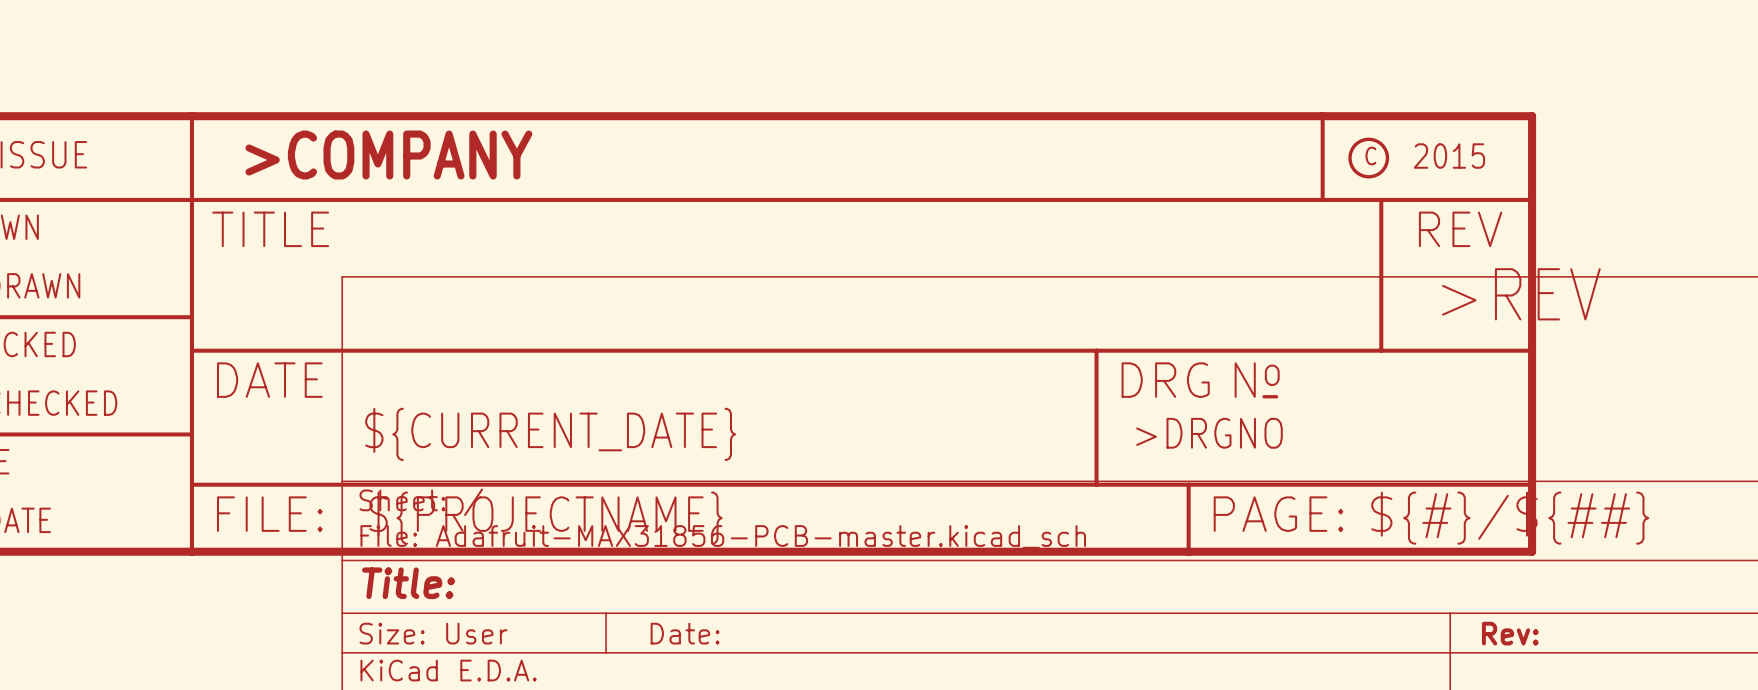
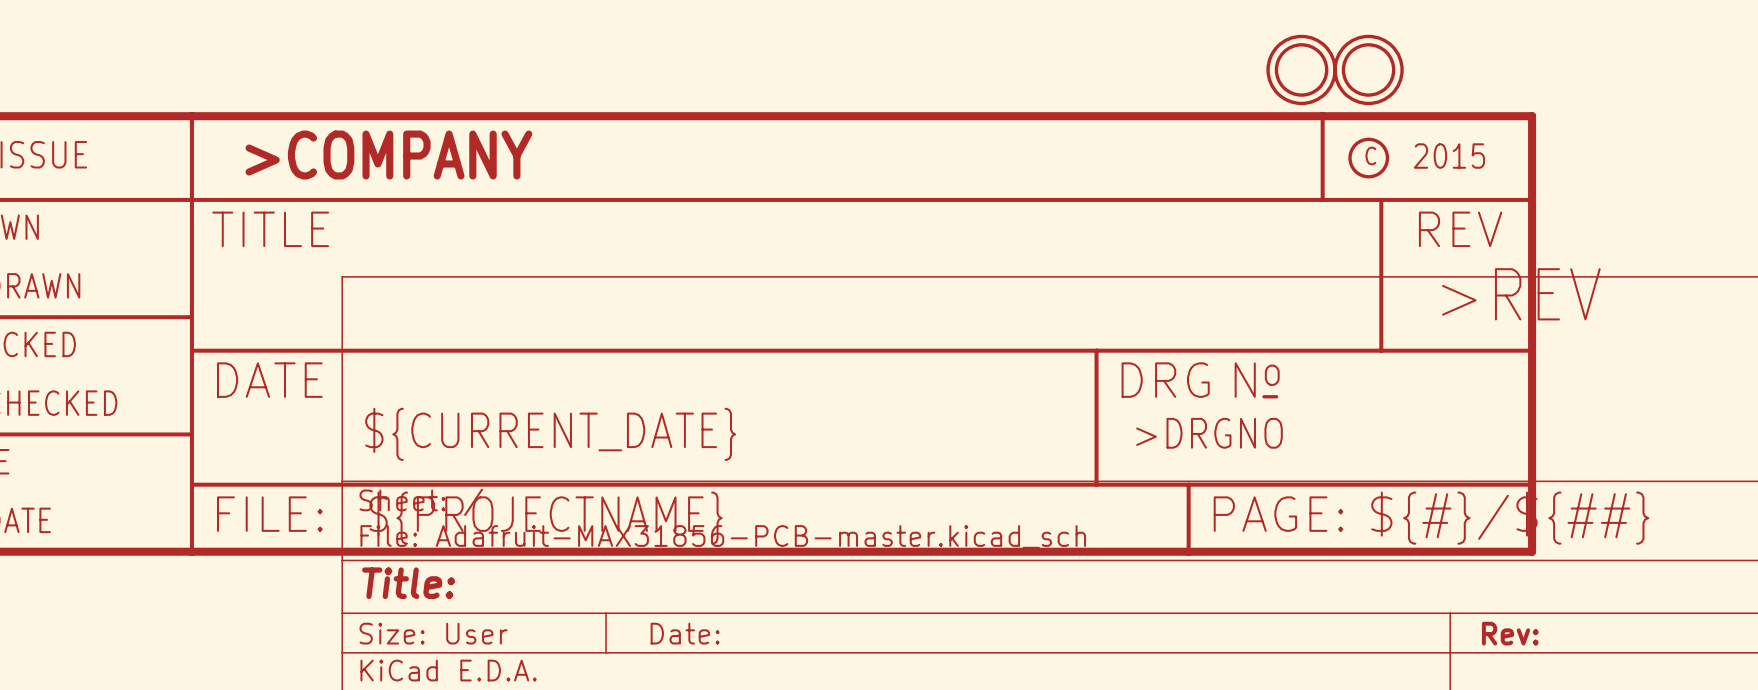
part: none -> (1301, 69)
part: none -> (1368, 69)

